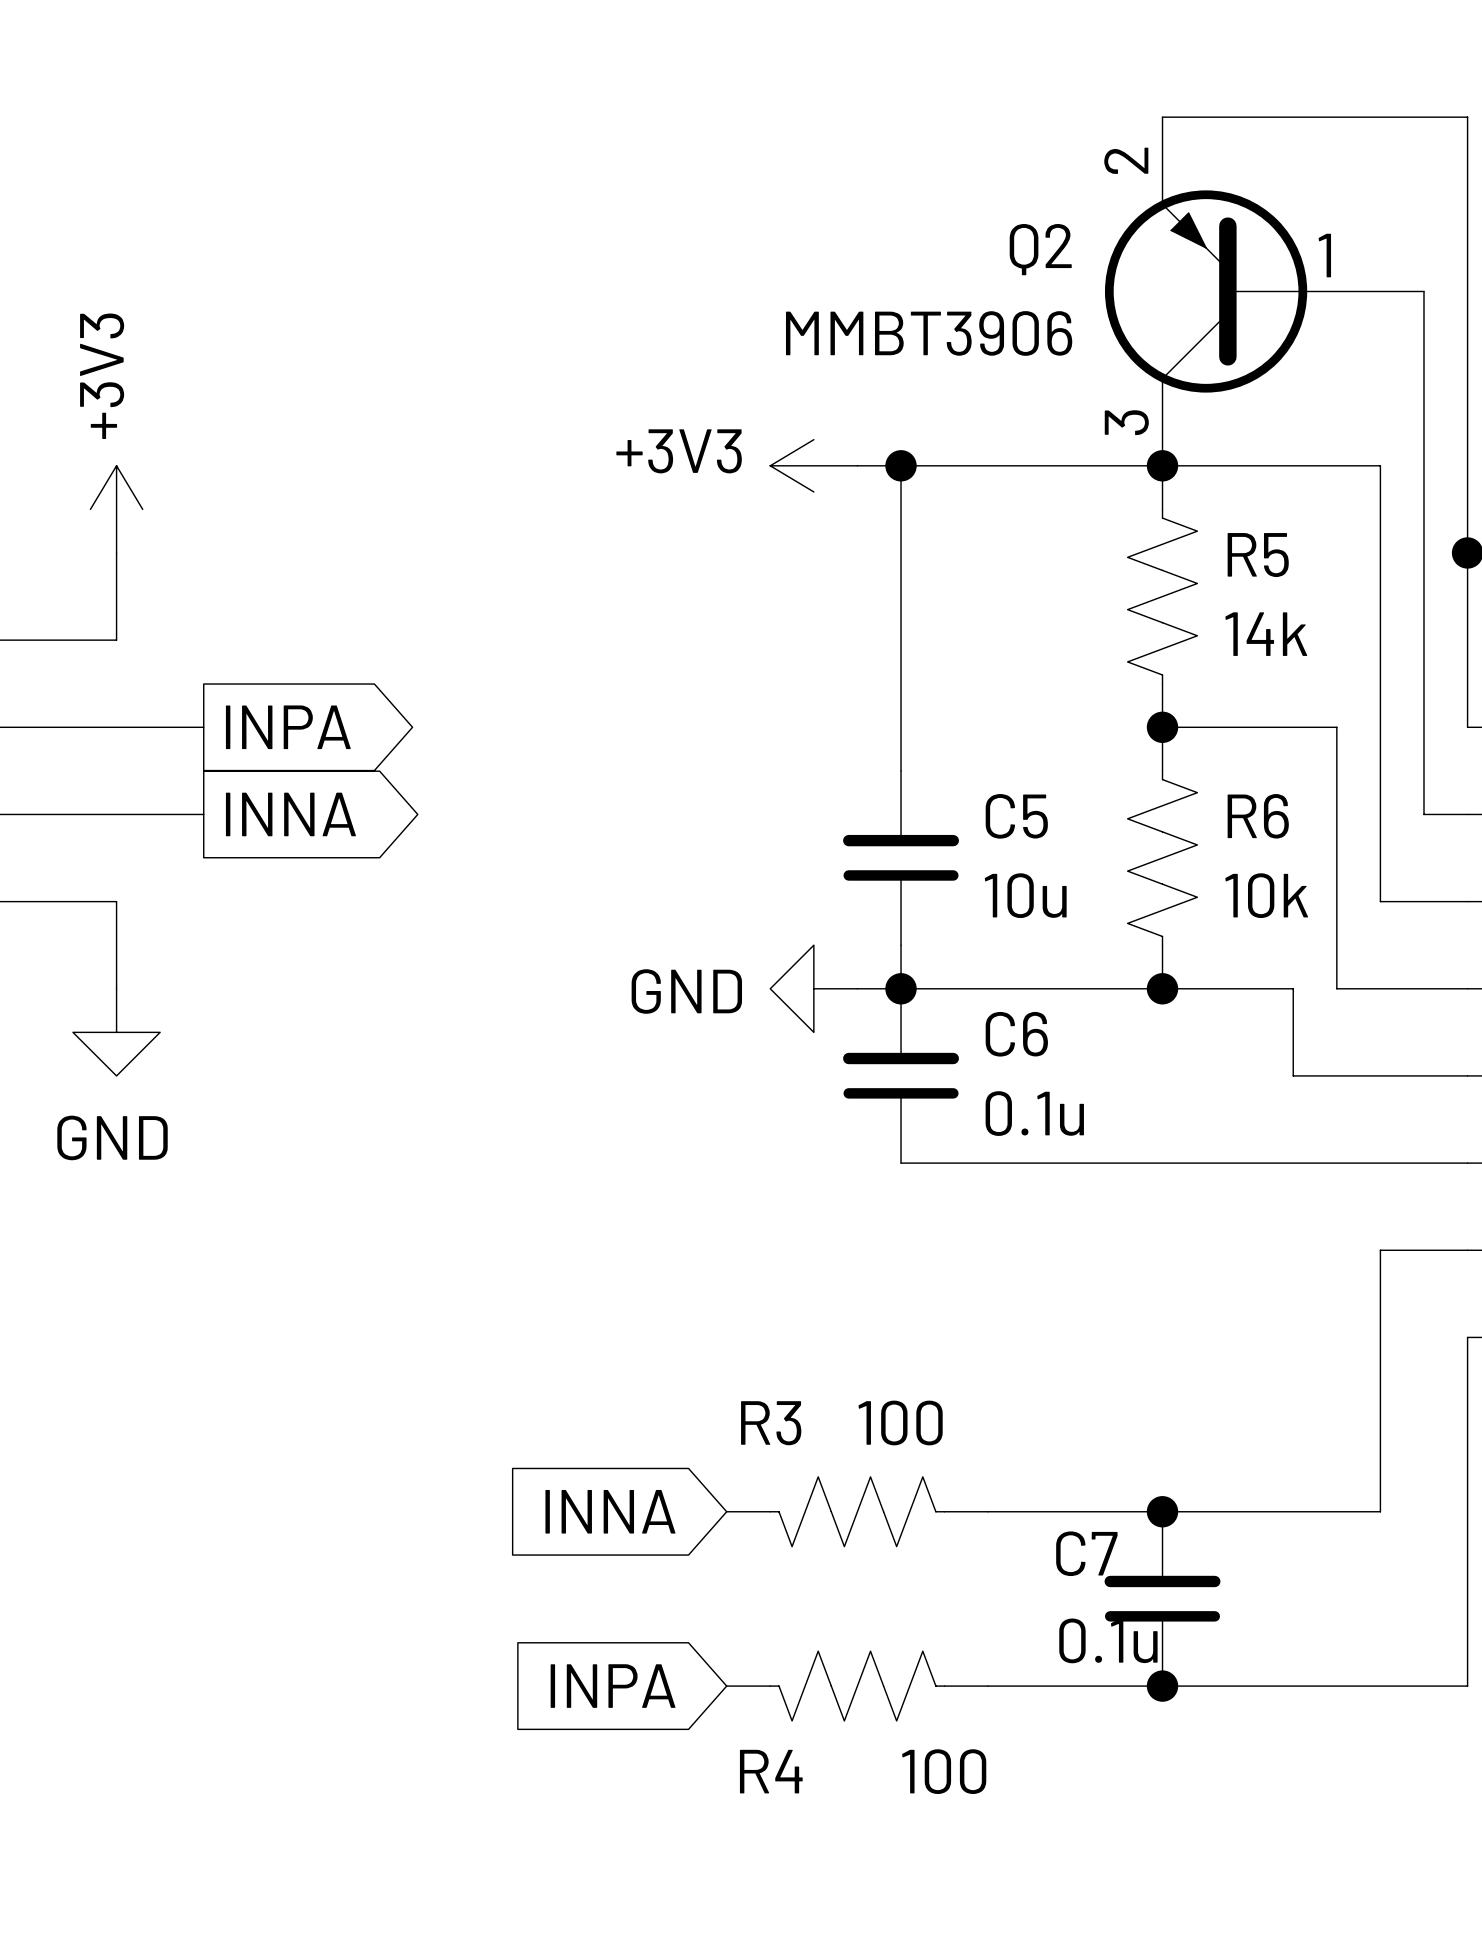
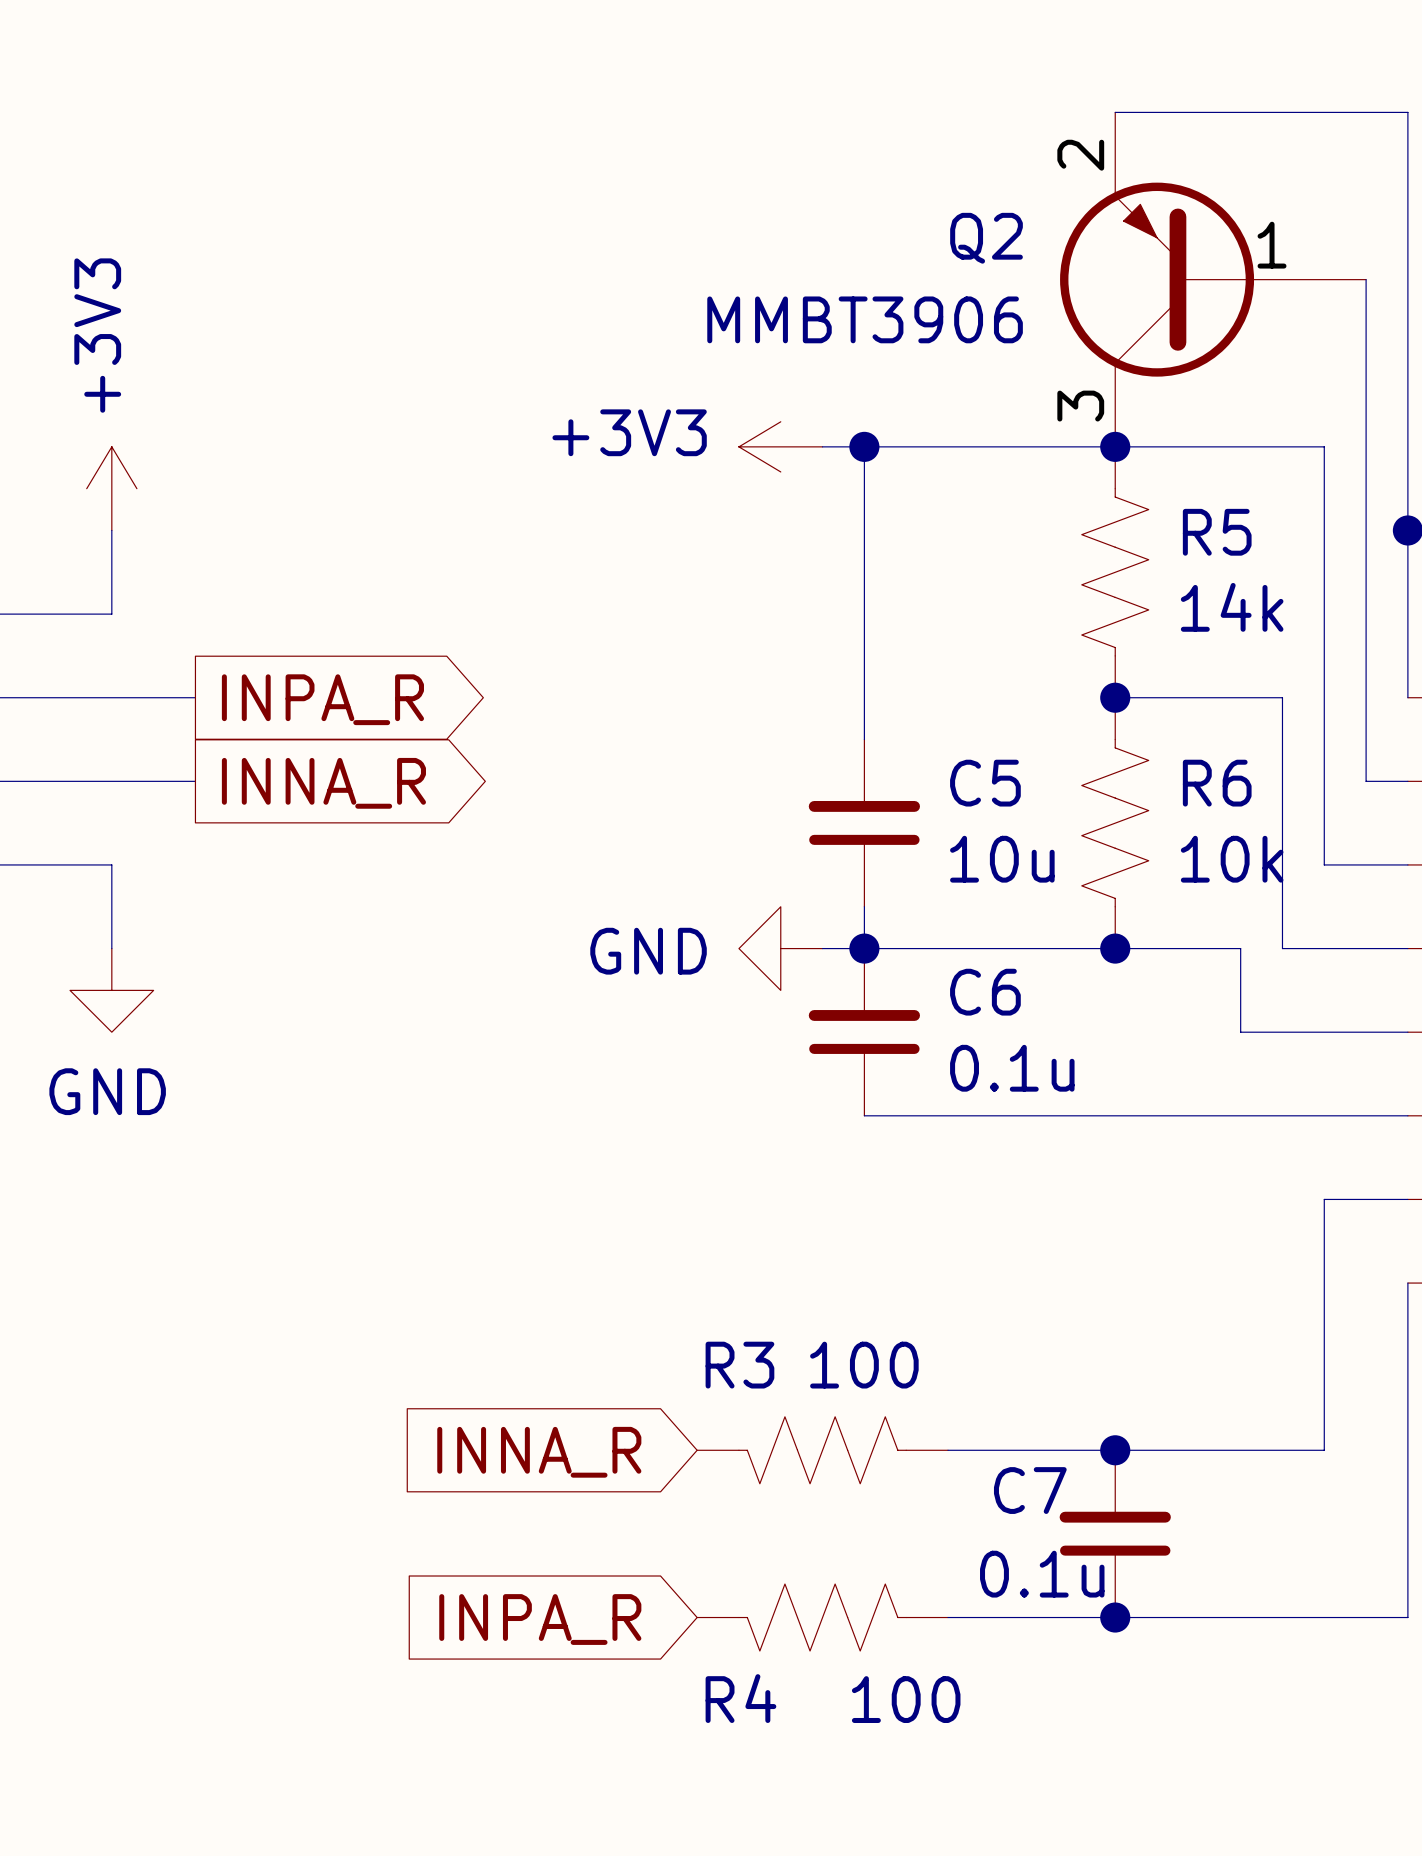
global label: INPA (288, 727) -> INPA_R (322, 699)
global label: INNA (290, 814) -> INNA_R (323, 783)
global label: INNA (610, 1511) -> INNA_R (539, 1452)
global label: INPA (613, 1686) -> INPA_R (540, 1619)

